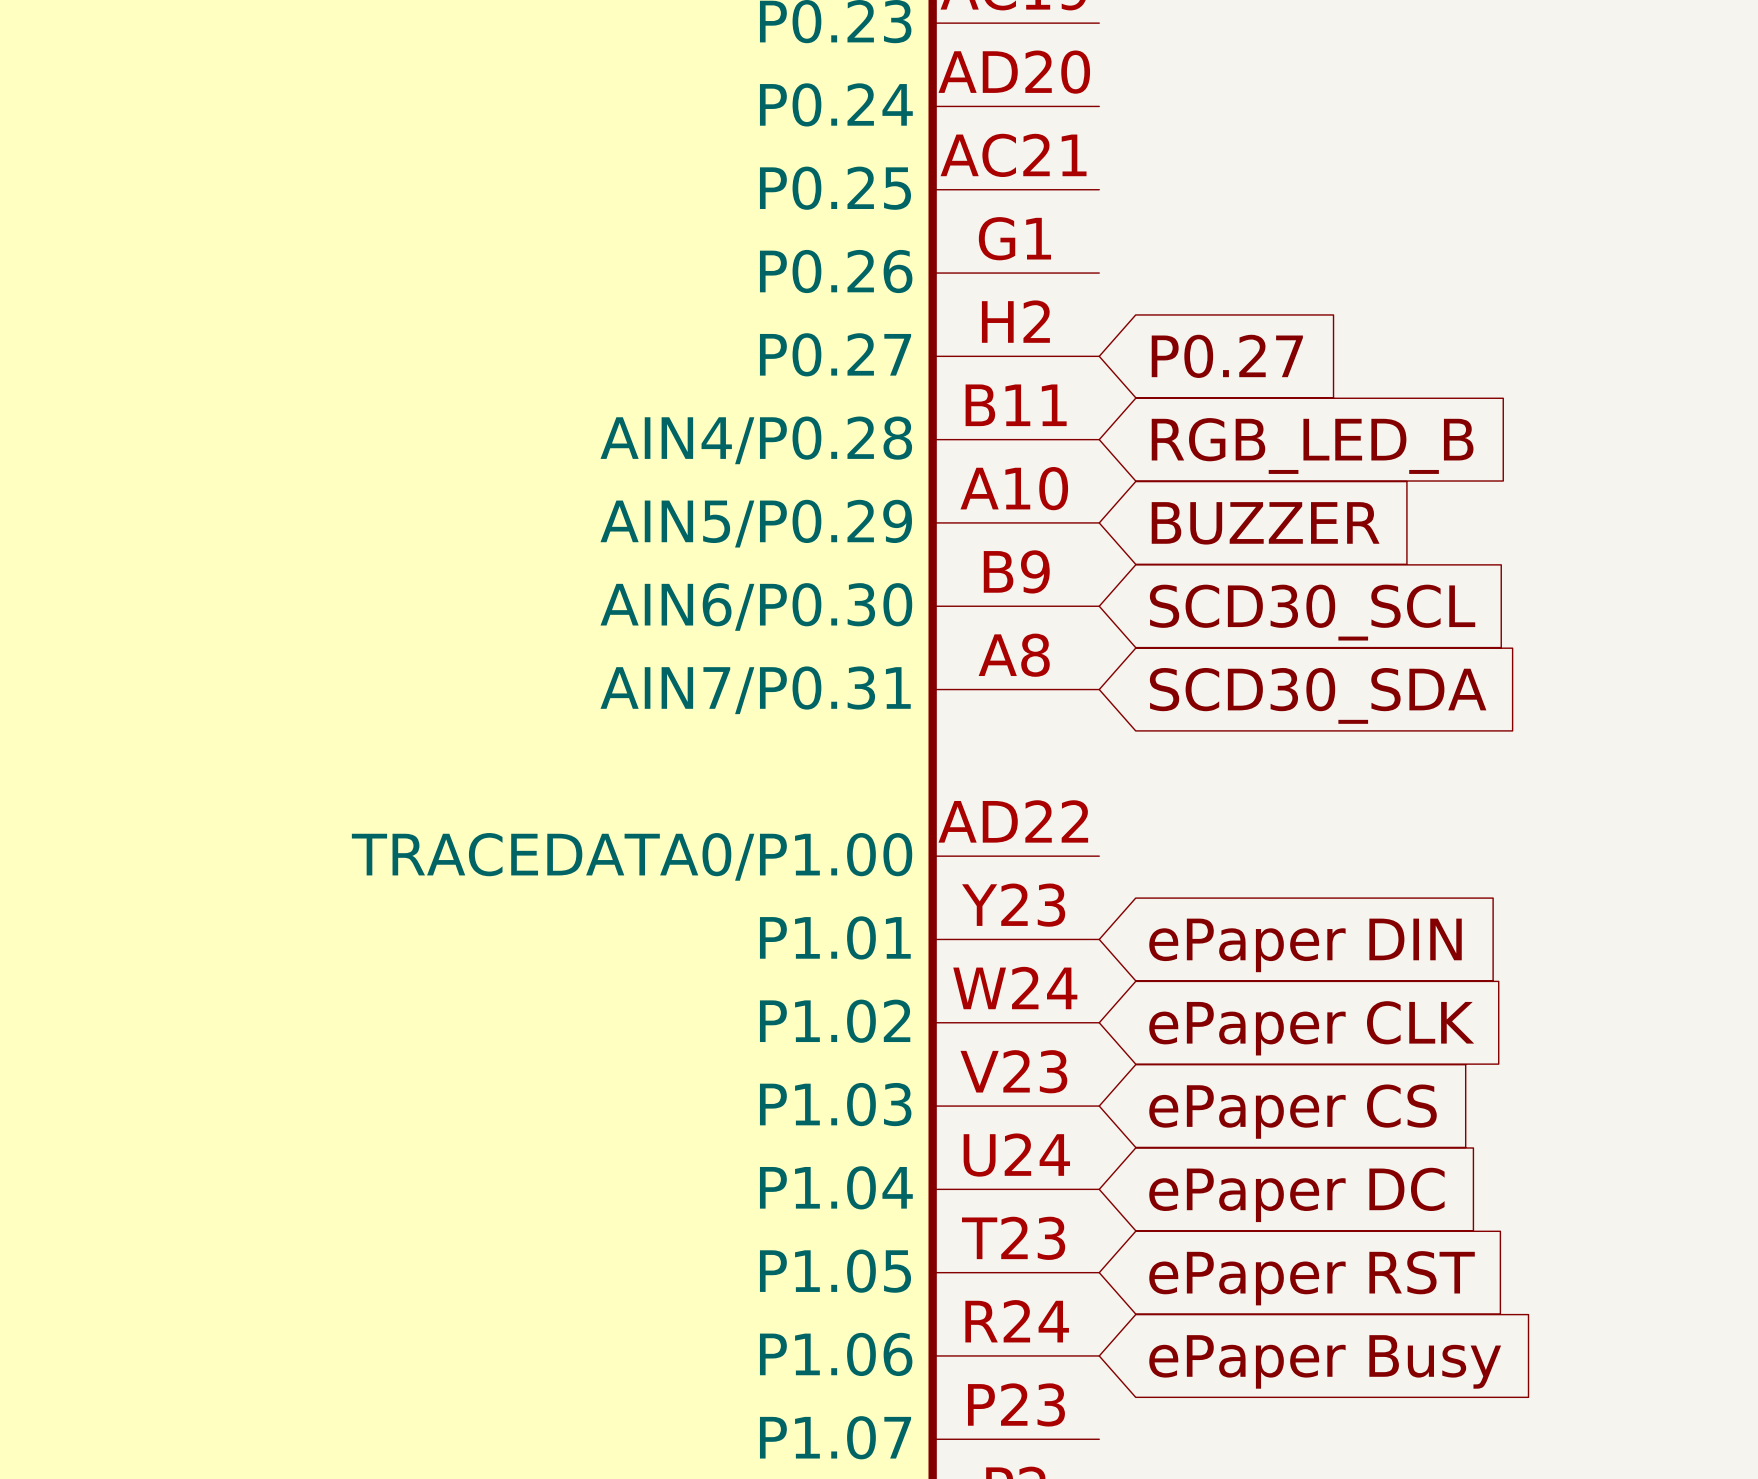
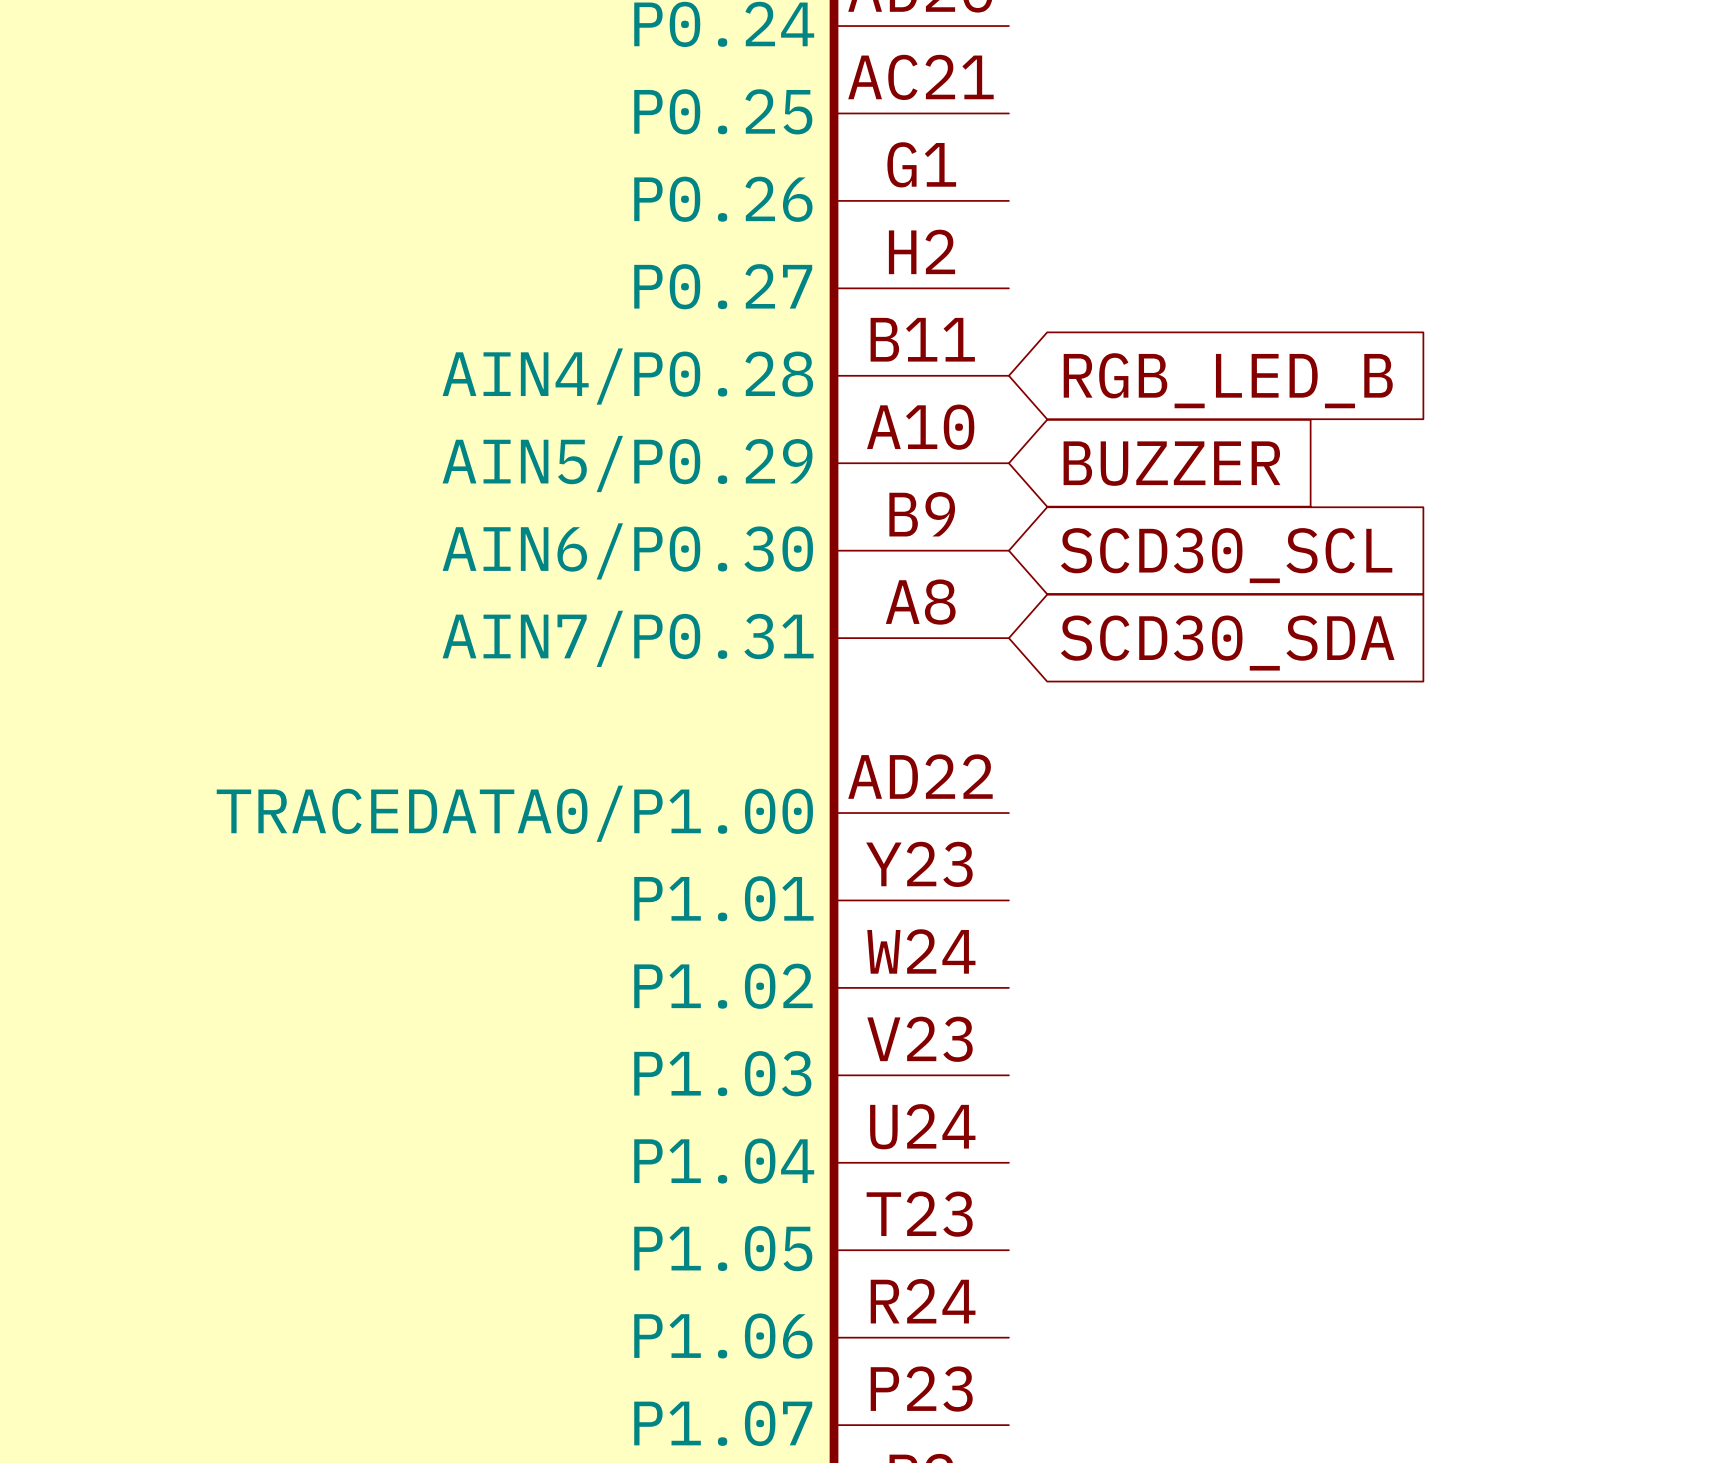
global label: P0.27 (1227, 356) -> none
global label: ePaper DIN (1305, 945) -> none
global label: ePaper CLK (1311, 1028) -> none
global label: ePaper CS (1293, 1111) -> none
global label: ePaper DC (1296, 1194) -> none
global label: ePaper RST (1312, 1278) -> none
global label: ePaper Busy (1325, 1361) -> none

